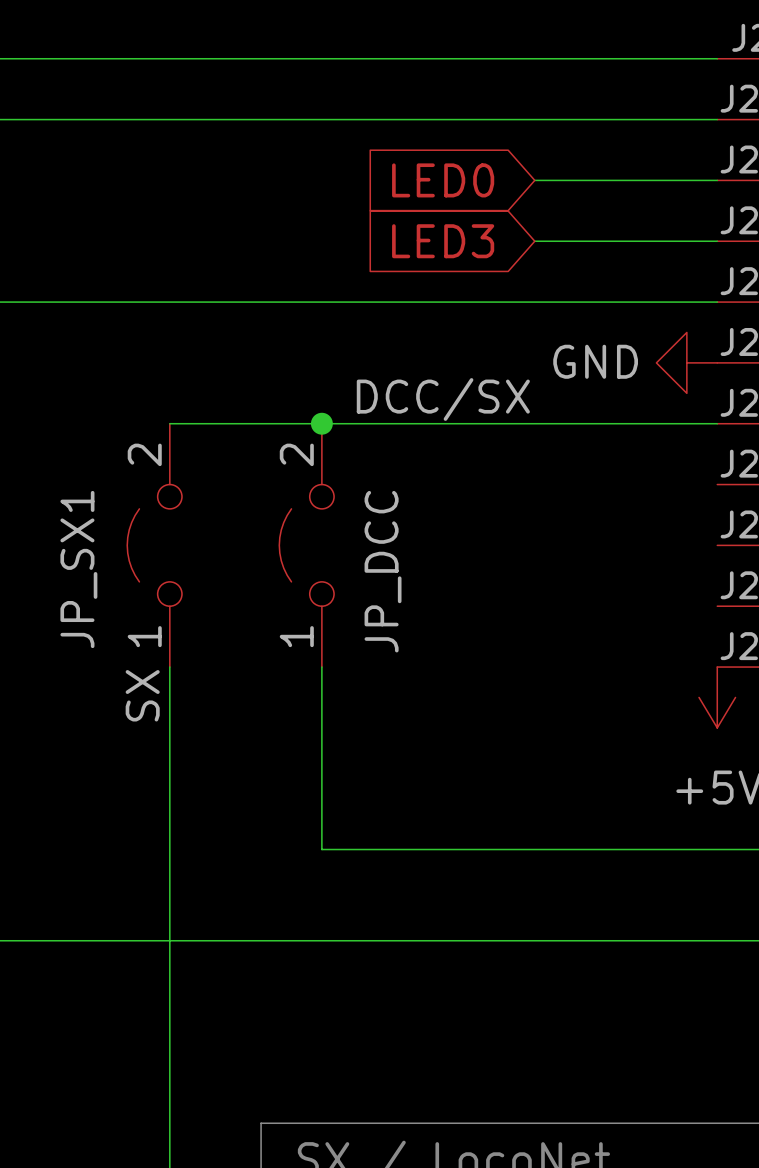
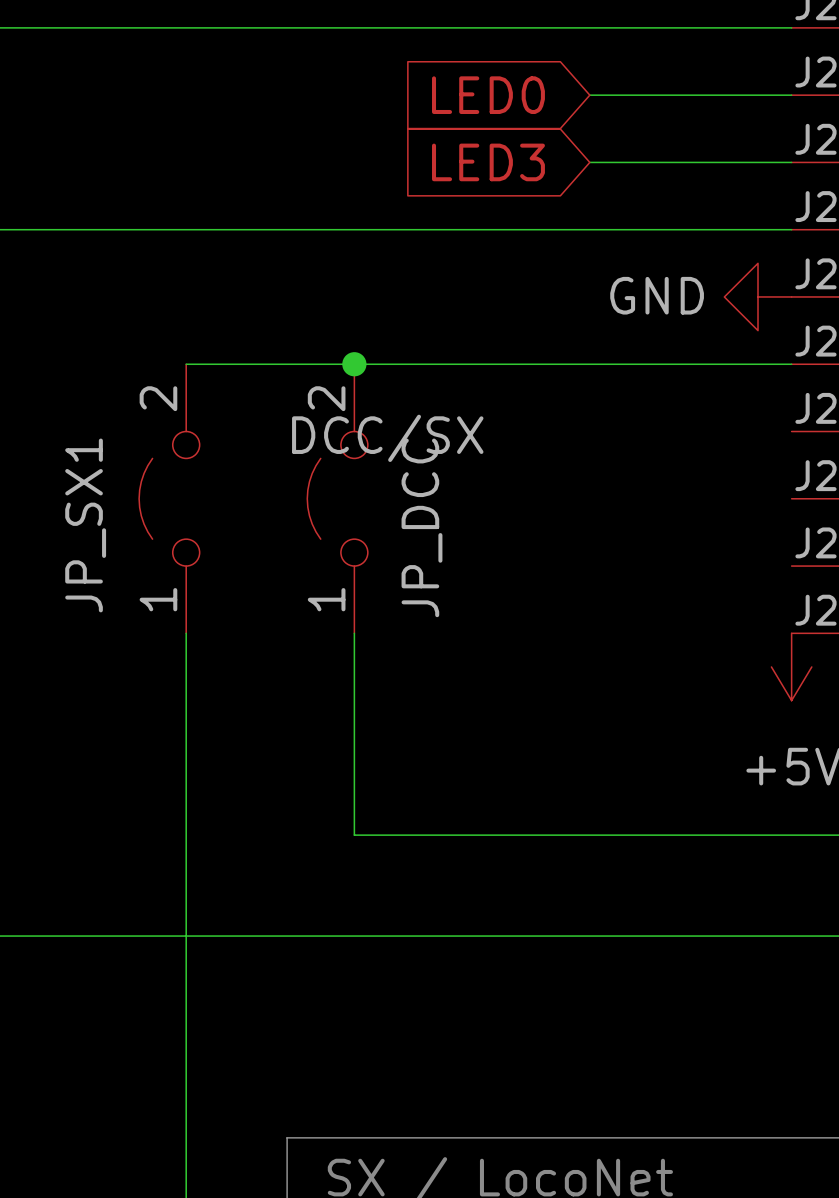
label position: DCC/SX (443, 399) -> DCC/SX (387, 438)
label: SX (142, 695) -> none

